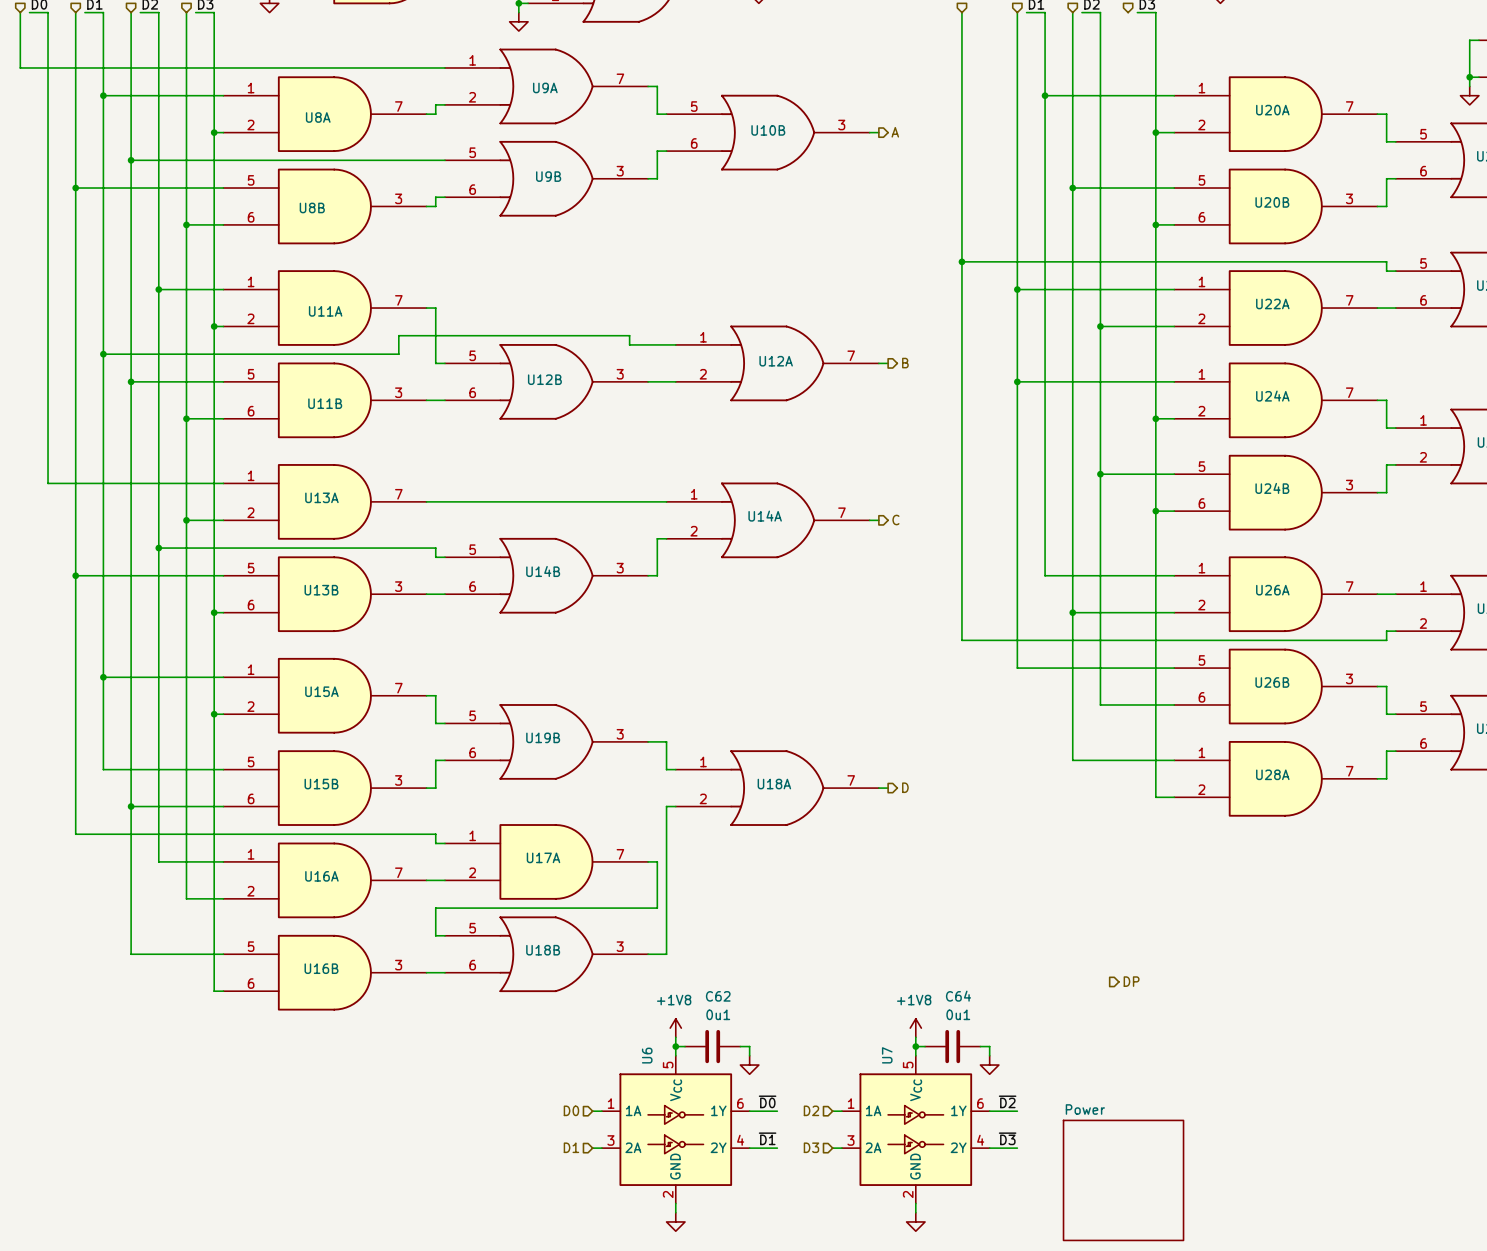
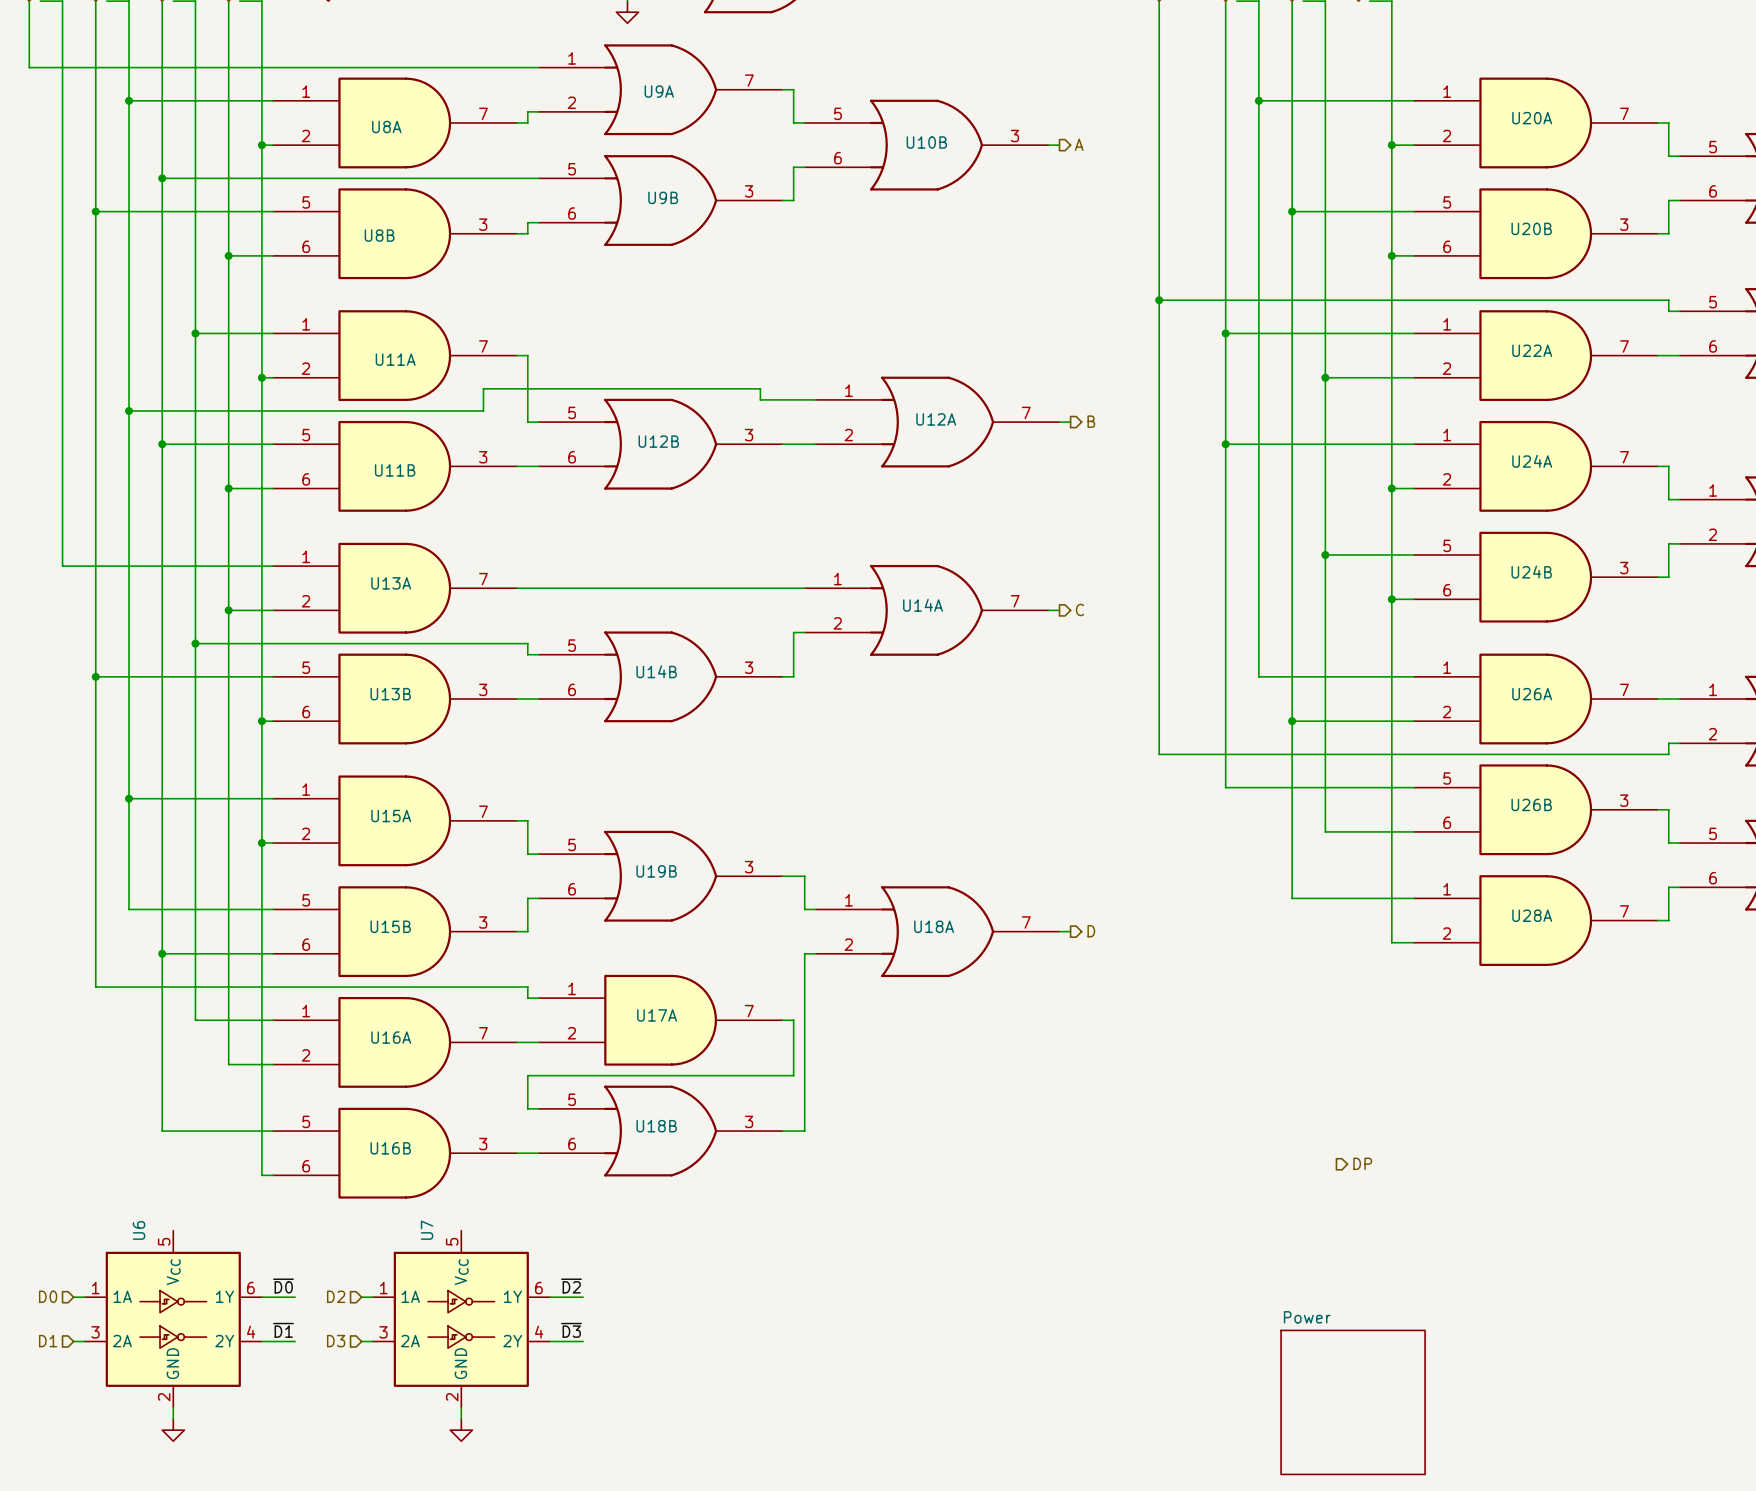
power symbol: +1V8 (675, 1028) -> none
power symbol: +1V8 (915, 1028) -> none
wire: (675, 1037) (675, 1055) -> none
wire: (915, 1037) (915, 1055) -> none
wire: (675, 1046) (685, 1046) -> none
junction: (675, 1046) -> none
C62: 0u1 (712, 1046) -> none
wire: (740, 1046) (749, 1046) (749, 1055) -> none
wire: (915, 1046) (925, 1046) -> none
junction: (915, 1046) -> none
C64: 0u1 (952, 1046) -> none
wire: (980, 1046) (989, 1046) (989, 1055) -> none
power symbol: (749, 1065) -> none
power symbol: (989, 1065) -> none
label: none -> ~{D0} (283, 1286)
label: none -> ~{D2} (571, 1286)
hierarchical label: none -> D0 (48, 1296)
wire: none -> (73, 1297) (84, 1297)
wire: none -> (261, 1297) (295, 1297)
hierarchical label: none -> D2 (336, 1296)
wire: none -> (361, 1297) (372, 1297)
wire: none -> (549, 1297) (583, 1297)
label: ~{D0} (767, 1101) -> none
label: ~{D2} (1007, 1101) -> none
hierarchical label: D0 (571, 1110) -> none
hierarchical label: D2 (811, 1110) -> none
wire: (592, 1111) (601, 1111) -> none
wire: (749, 1111) (777, 1111) -> none
wire: (832, 1111) (841, 1111) -> none
wire: (989, 1111) (1017, 1111) -> none
label: none -> ~{D1} (283, 1330)
label: none -> ~{D3} (571, 1330)
hierarchical label: none -> D1 (48, 1341)
wire: none -> (73, 1341) (84, 1341)
wire: none -> (261, 1341) (295, 1341)
hierarchical label: none -> D3 (336, 1341)
wire: none -> (361, 1341) (372, 1341)
wire: none -> (549, 1341) (583, 1341)
U6 position: (675, 1129) -> (173, 1319)
U7 position: (915, 1129) -> (461, 1319)
label: ~{D1} (767, 1138) -> none
label: ~{D3} (1007, 1138) -> none
hierarchical label: D1 (571, 1147) -> none
hierarchical label: D3 (811, 1147) -> none
wire: (592, 1148) (601, 1148) -> none
wire: (749, 1148) (777, 1148) -> none
wire: (832, 1148) (841, 1148) -> none
wire: (989, 1148) (1017, 1148) -> none
wire: none -> (173, 1407) (173, 1419)
wire: none -> (461, 1407) (461, 1419)
power symbol: none -> (173, 1430)
power symbol: none -> (461, 1430)
wire: (675, 1203) (675, 1212) -> none
wire: (915, 1203) (915, 1212) -> none
power symbol: (675, 1221) -> none
power symbol: (915, 1221) -> none

